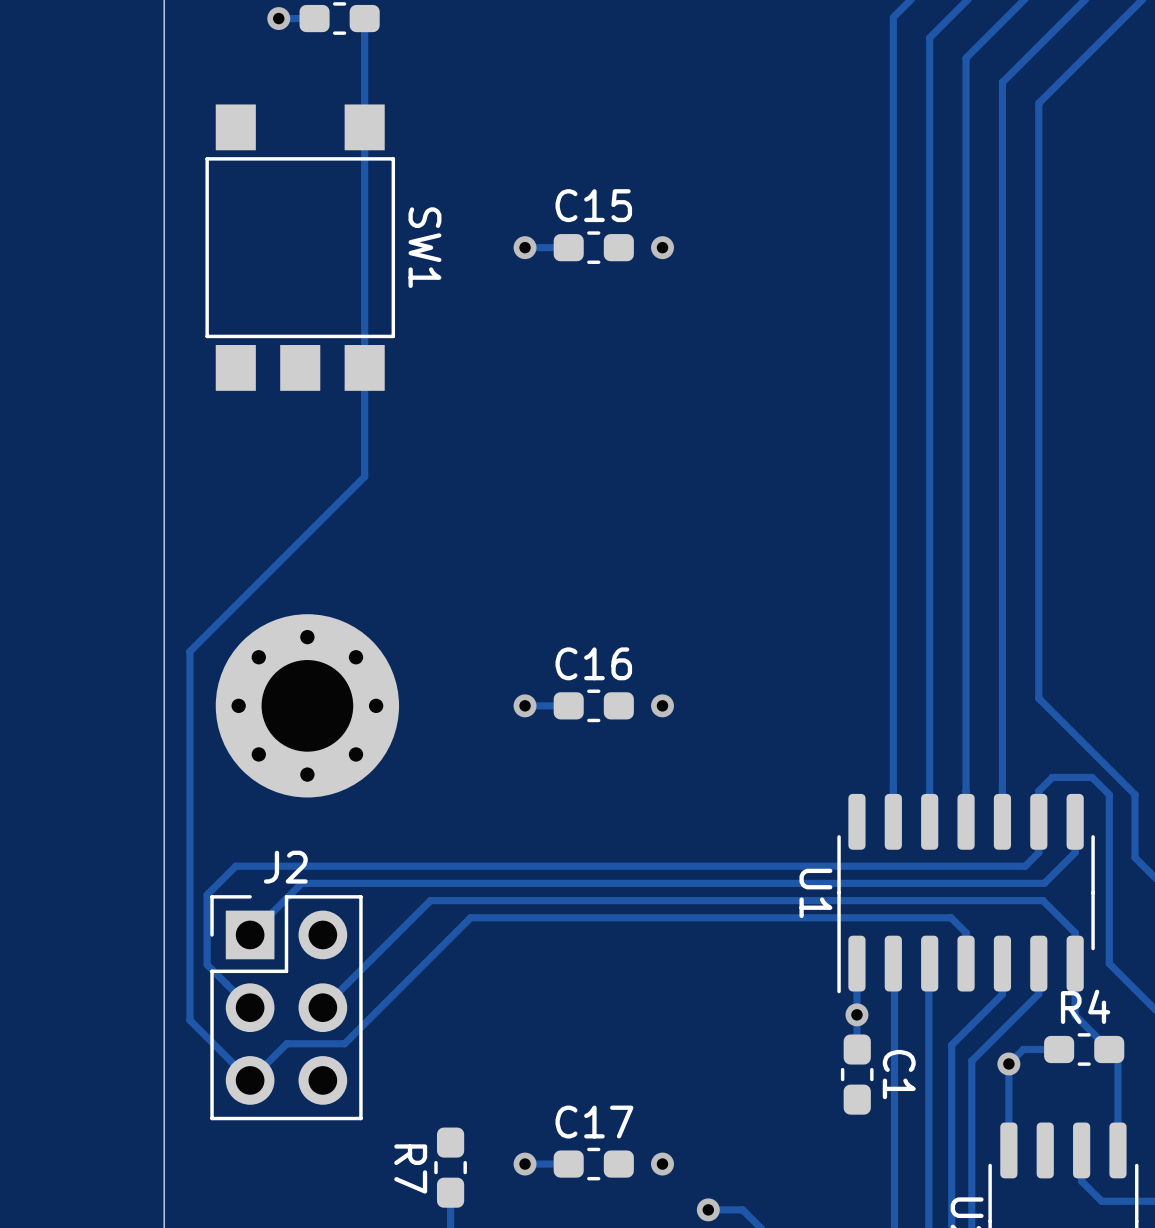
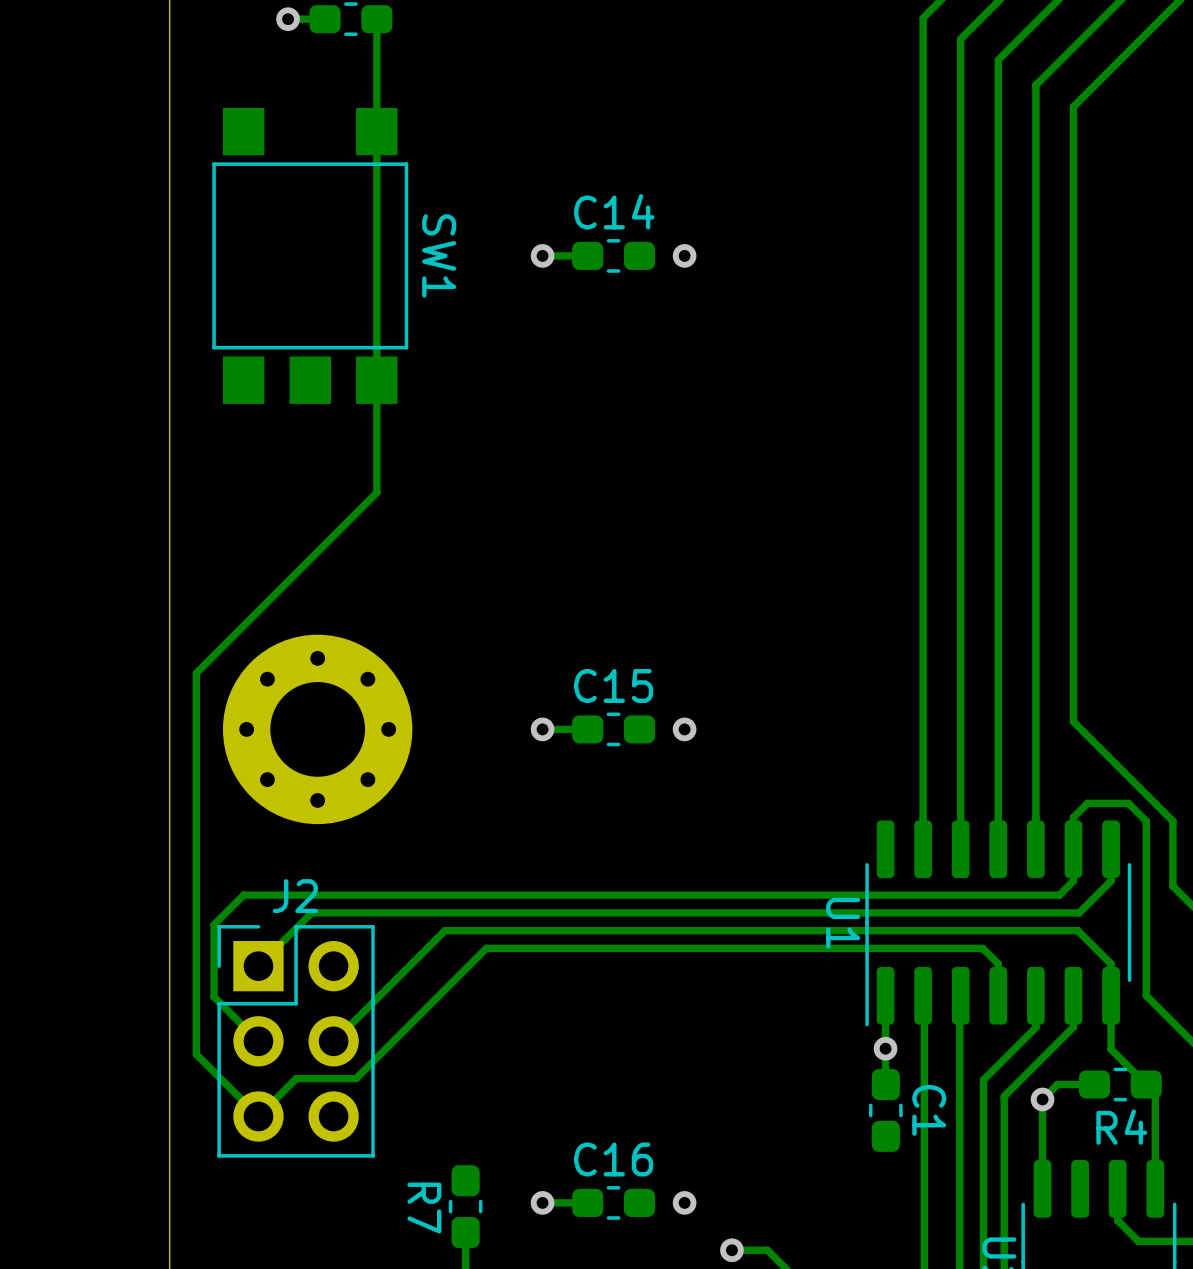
C15 name: C15 (593, 205) -> C14 (614, 211)
C16 name: C16 (593, 663) -> C15 (613, 685)
R4 name position: R4 (1085, 1006) -> R4 (1121, 1127)
C17 name: C17 (594, 1122) -> C16 (613, 1159)

